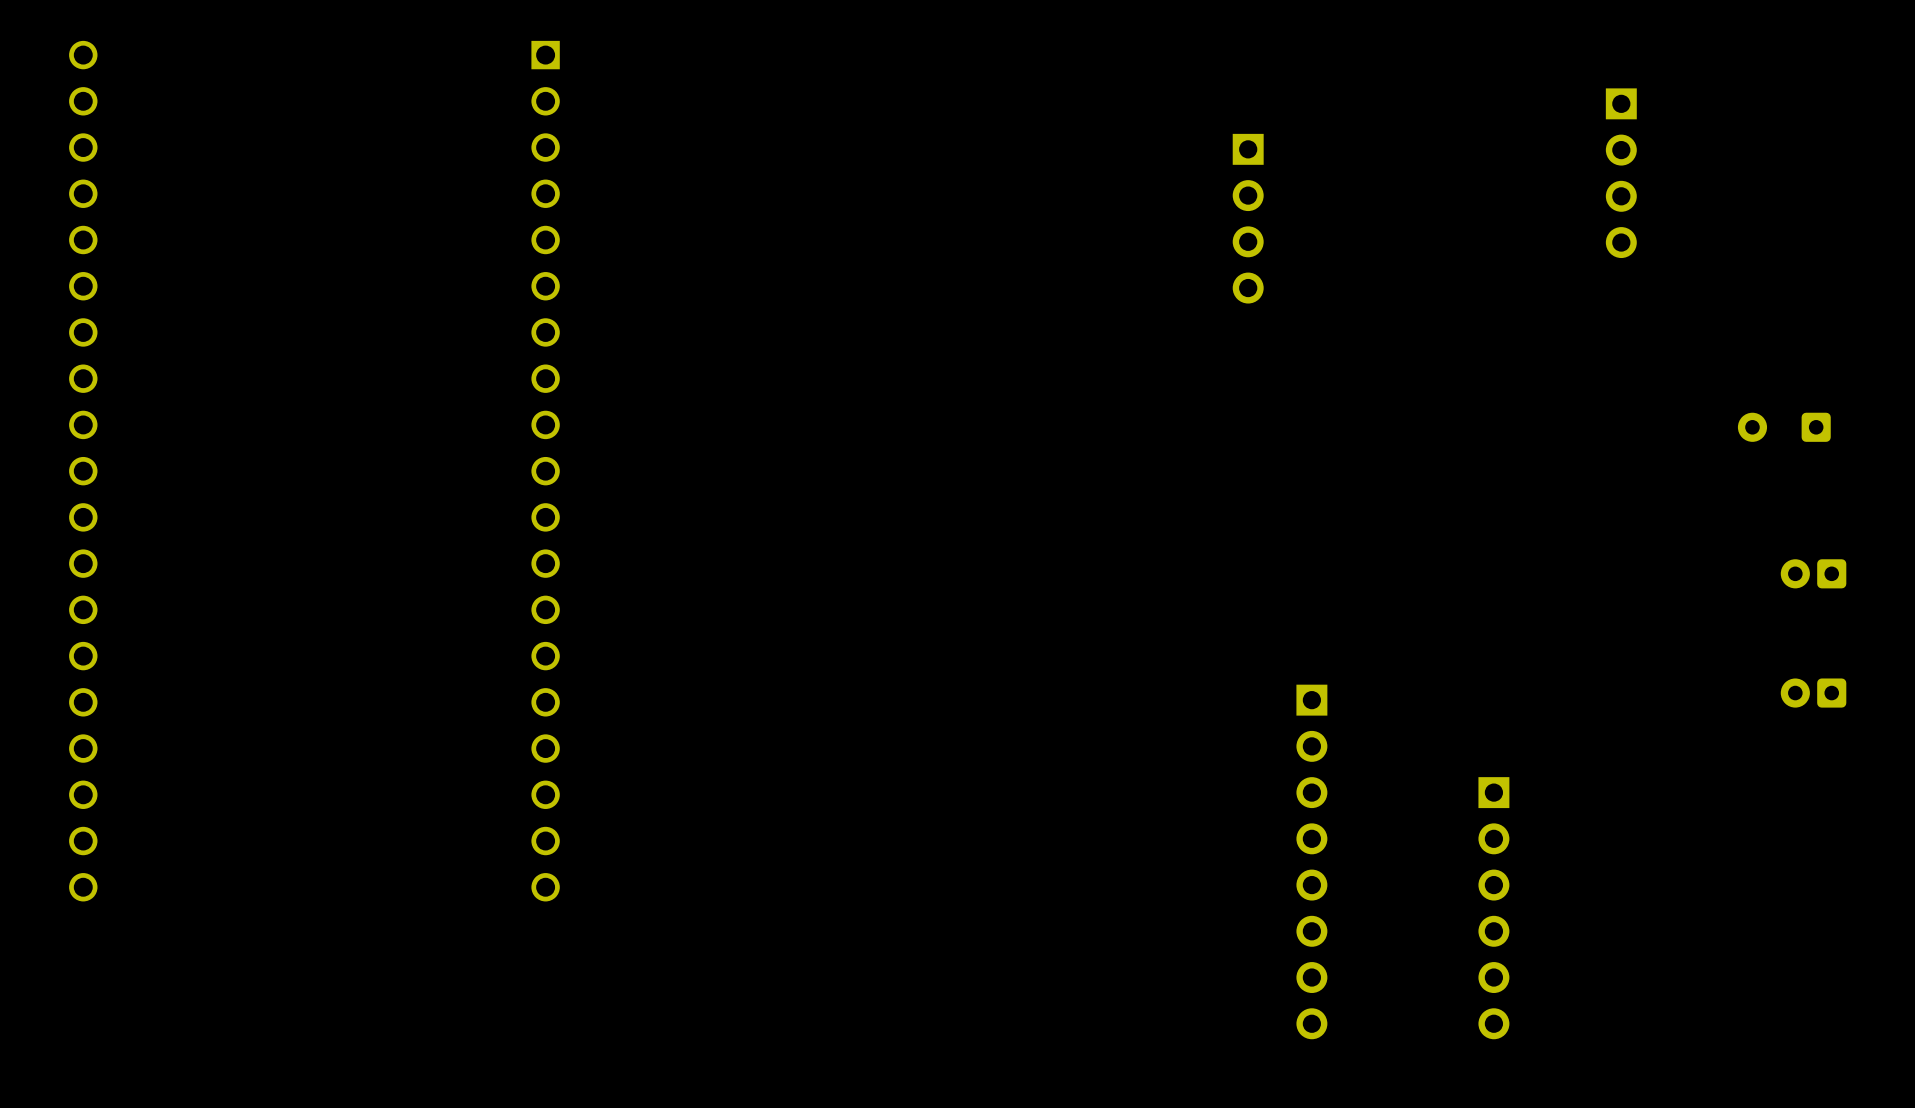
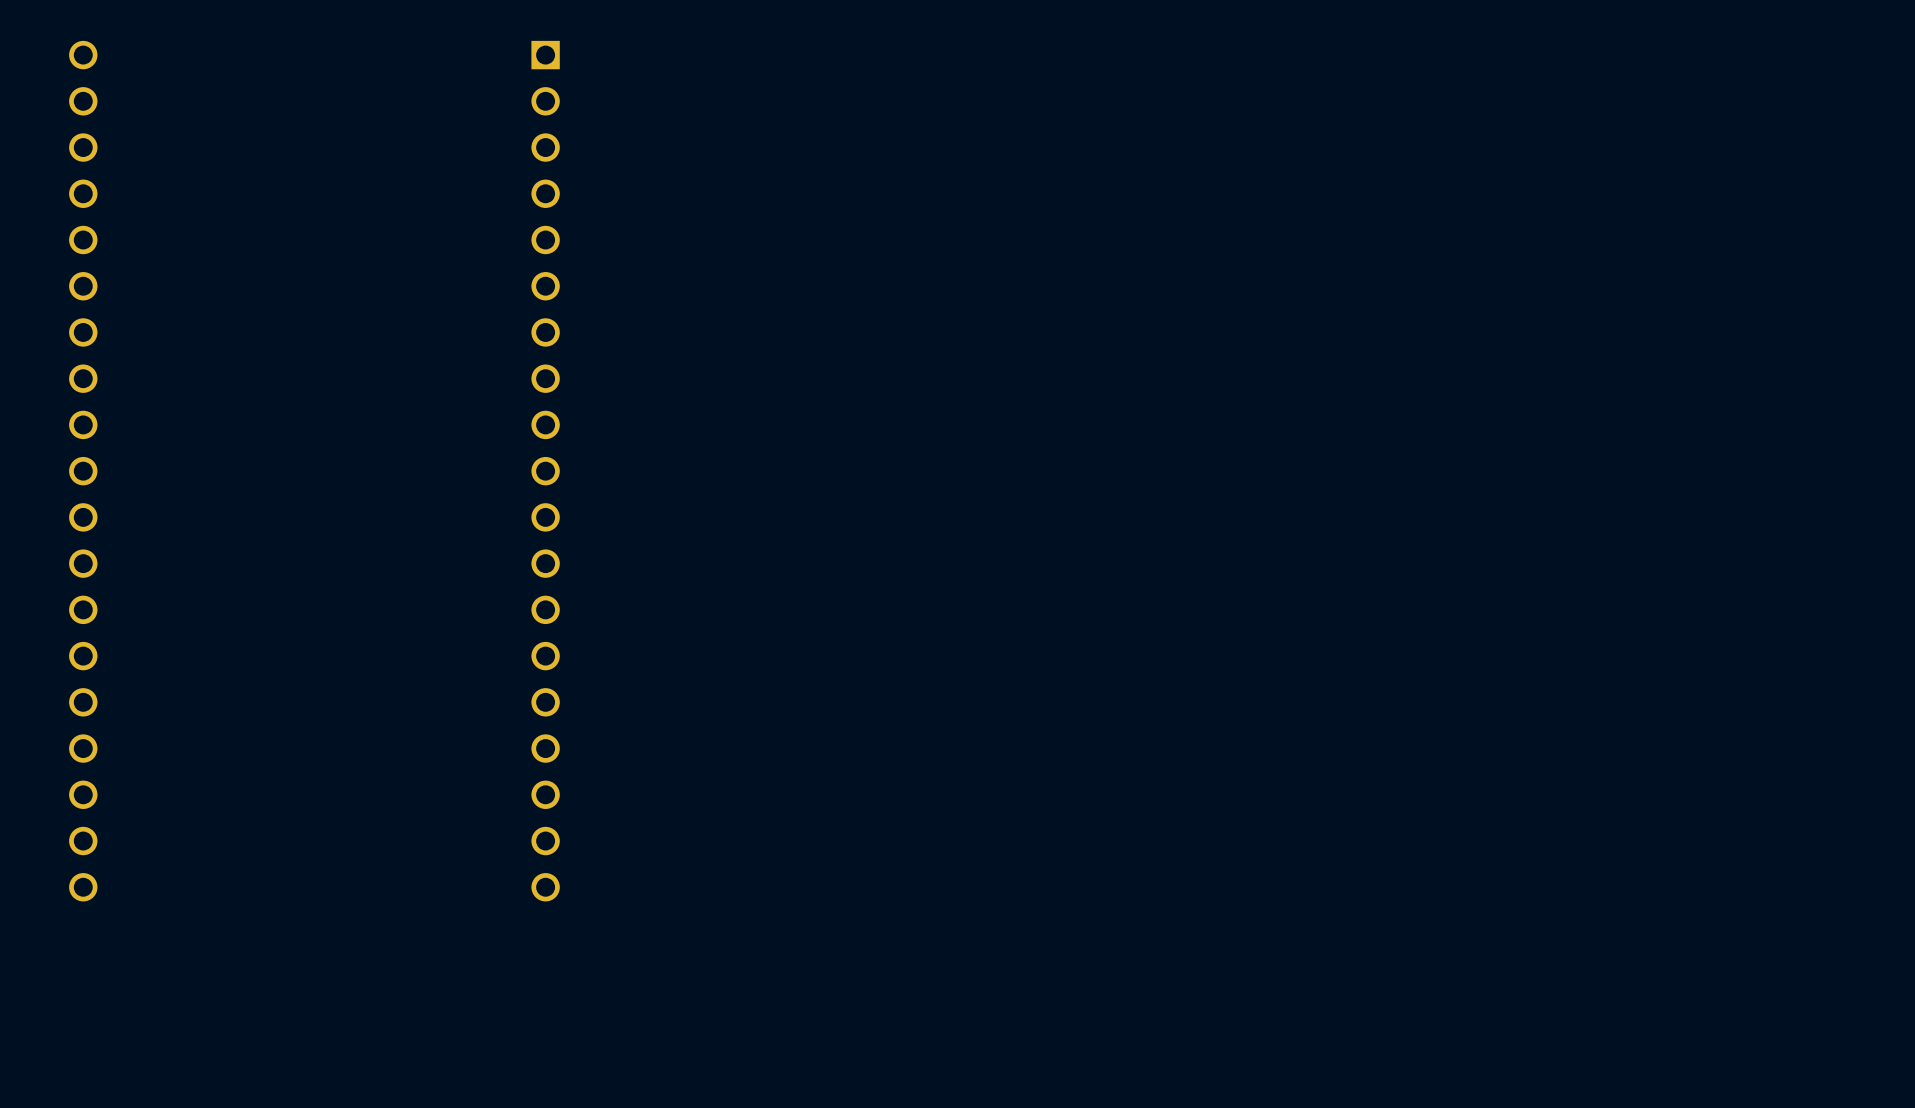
part: (1621, 173) -> none
part: (1248, 218) -> none
part: (1784, 427) -> none
part: (1813, 573) -> none
part: (1813, 693) -> none
part: (1311, 861) -> none
part: (1493, 908) -> none

